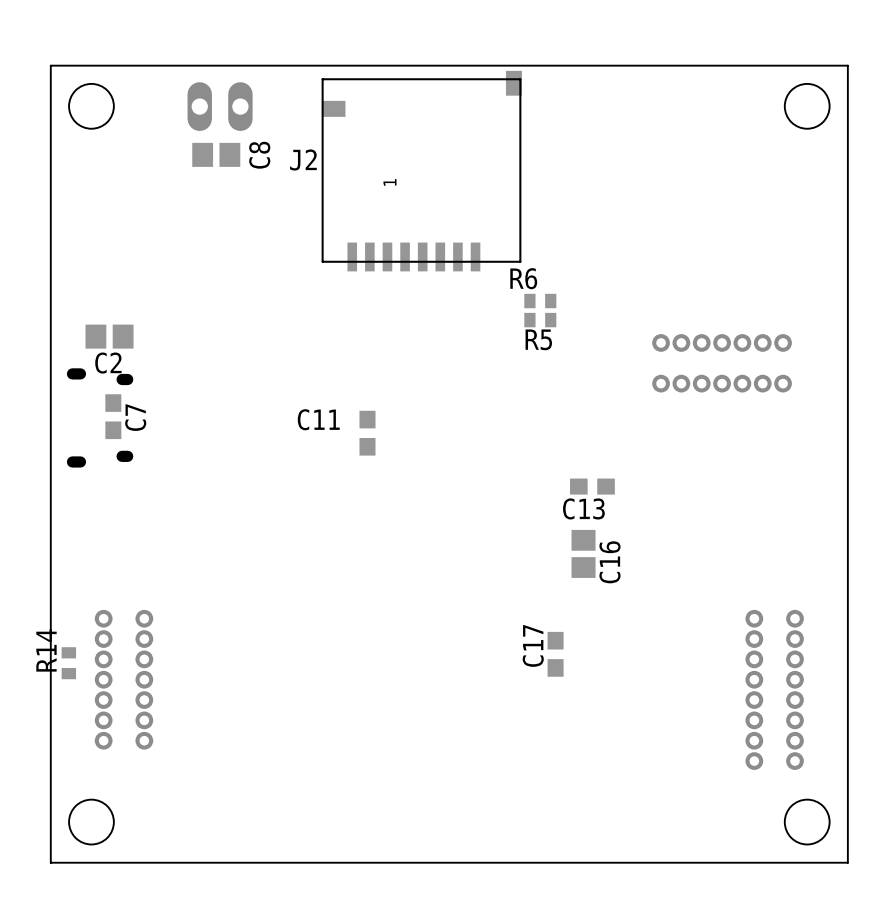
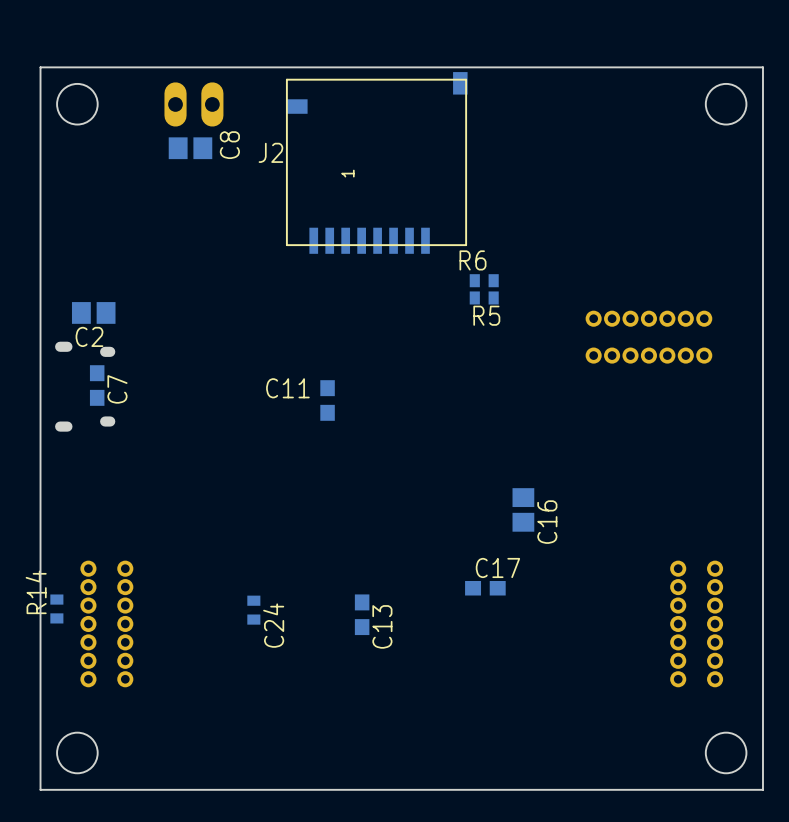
C13 rotation: 0° (592, 486) -> 90° clockwise (362, 614)
C13 position: (592, 486) -> (362, 614)
C13 name position: C13 (583, 508) -> C13 (382, 626)
part footprint: [745, 609, 804, 770] -> [670, 560, 724, 688]
C17 rotation: 0° (555, 654) -> 90° clockwise (485, 588)
C24: none -> (253, 610)

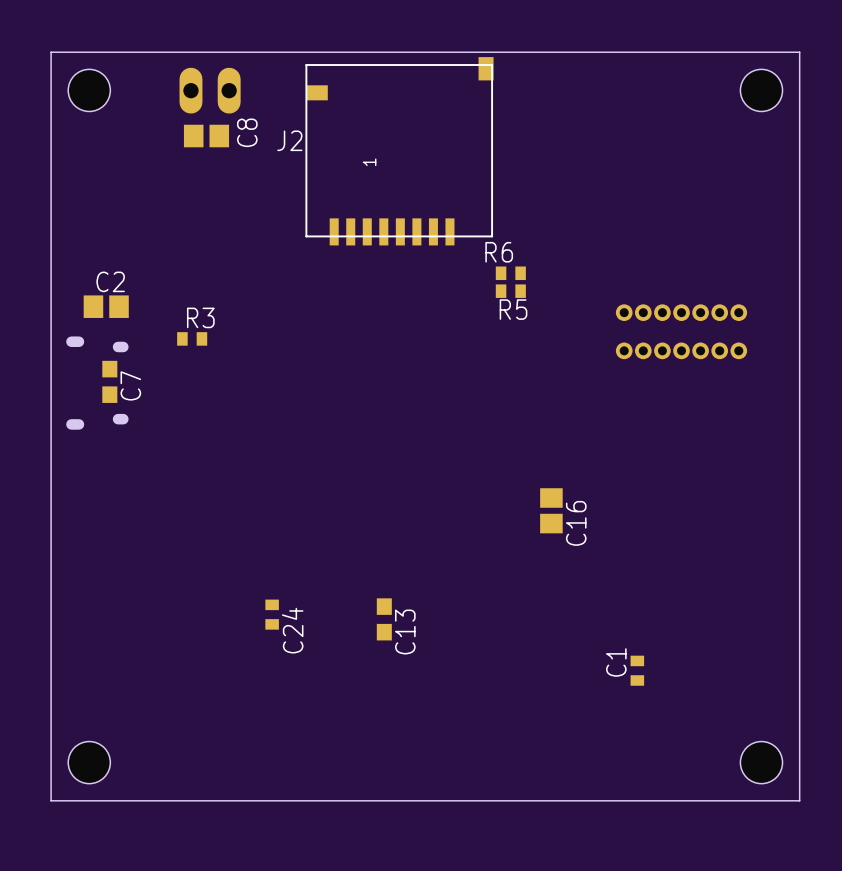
C2 name position: C2 (89, 336) -> C2 (110, 281)
R3: none -> (192, 338)
C11: (327, 400) -> none
C17: (485, 588) -> none
R14: (56, 608) -> none
part: (106, 623) -> none
part: (696, 623) -> none
C1: none -> (637, 670)

